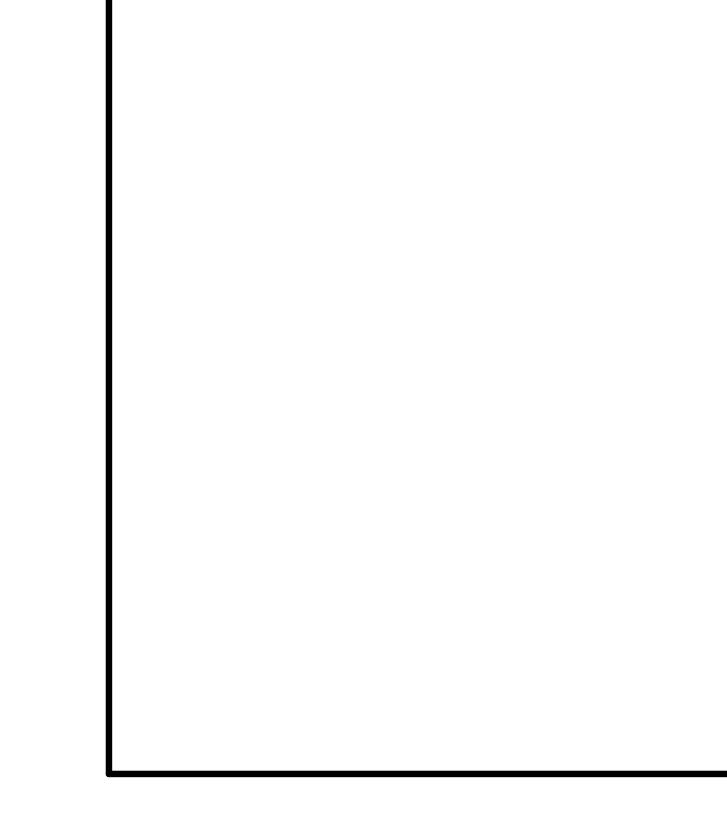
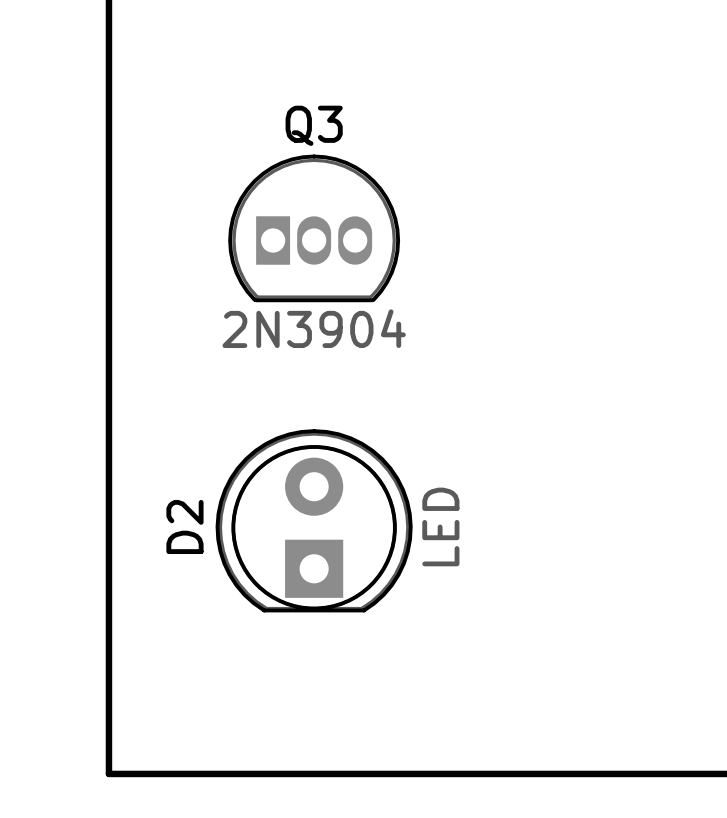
Q3: none -> 2N3904 (314, 228)
D2: none -> LED (314, 520)

